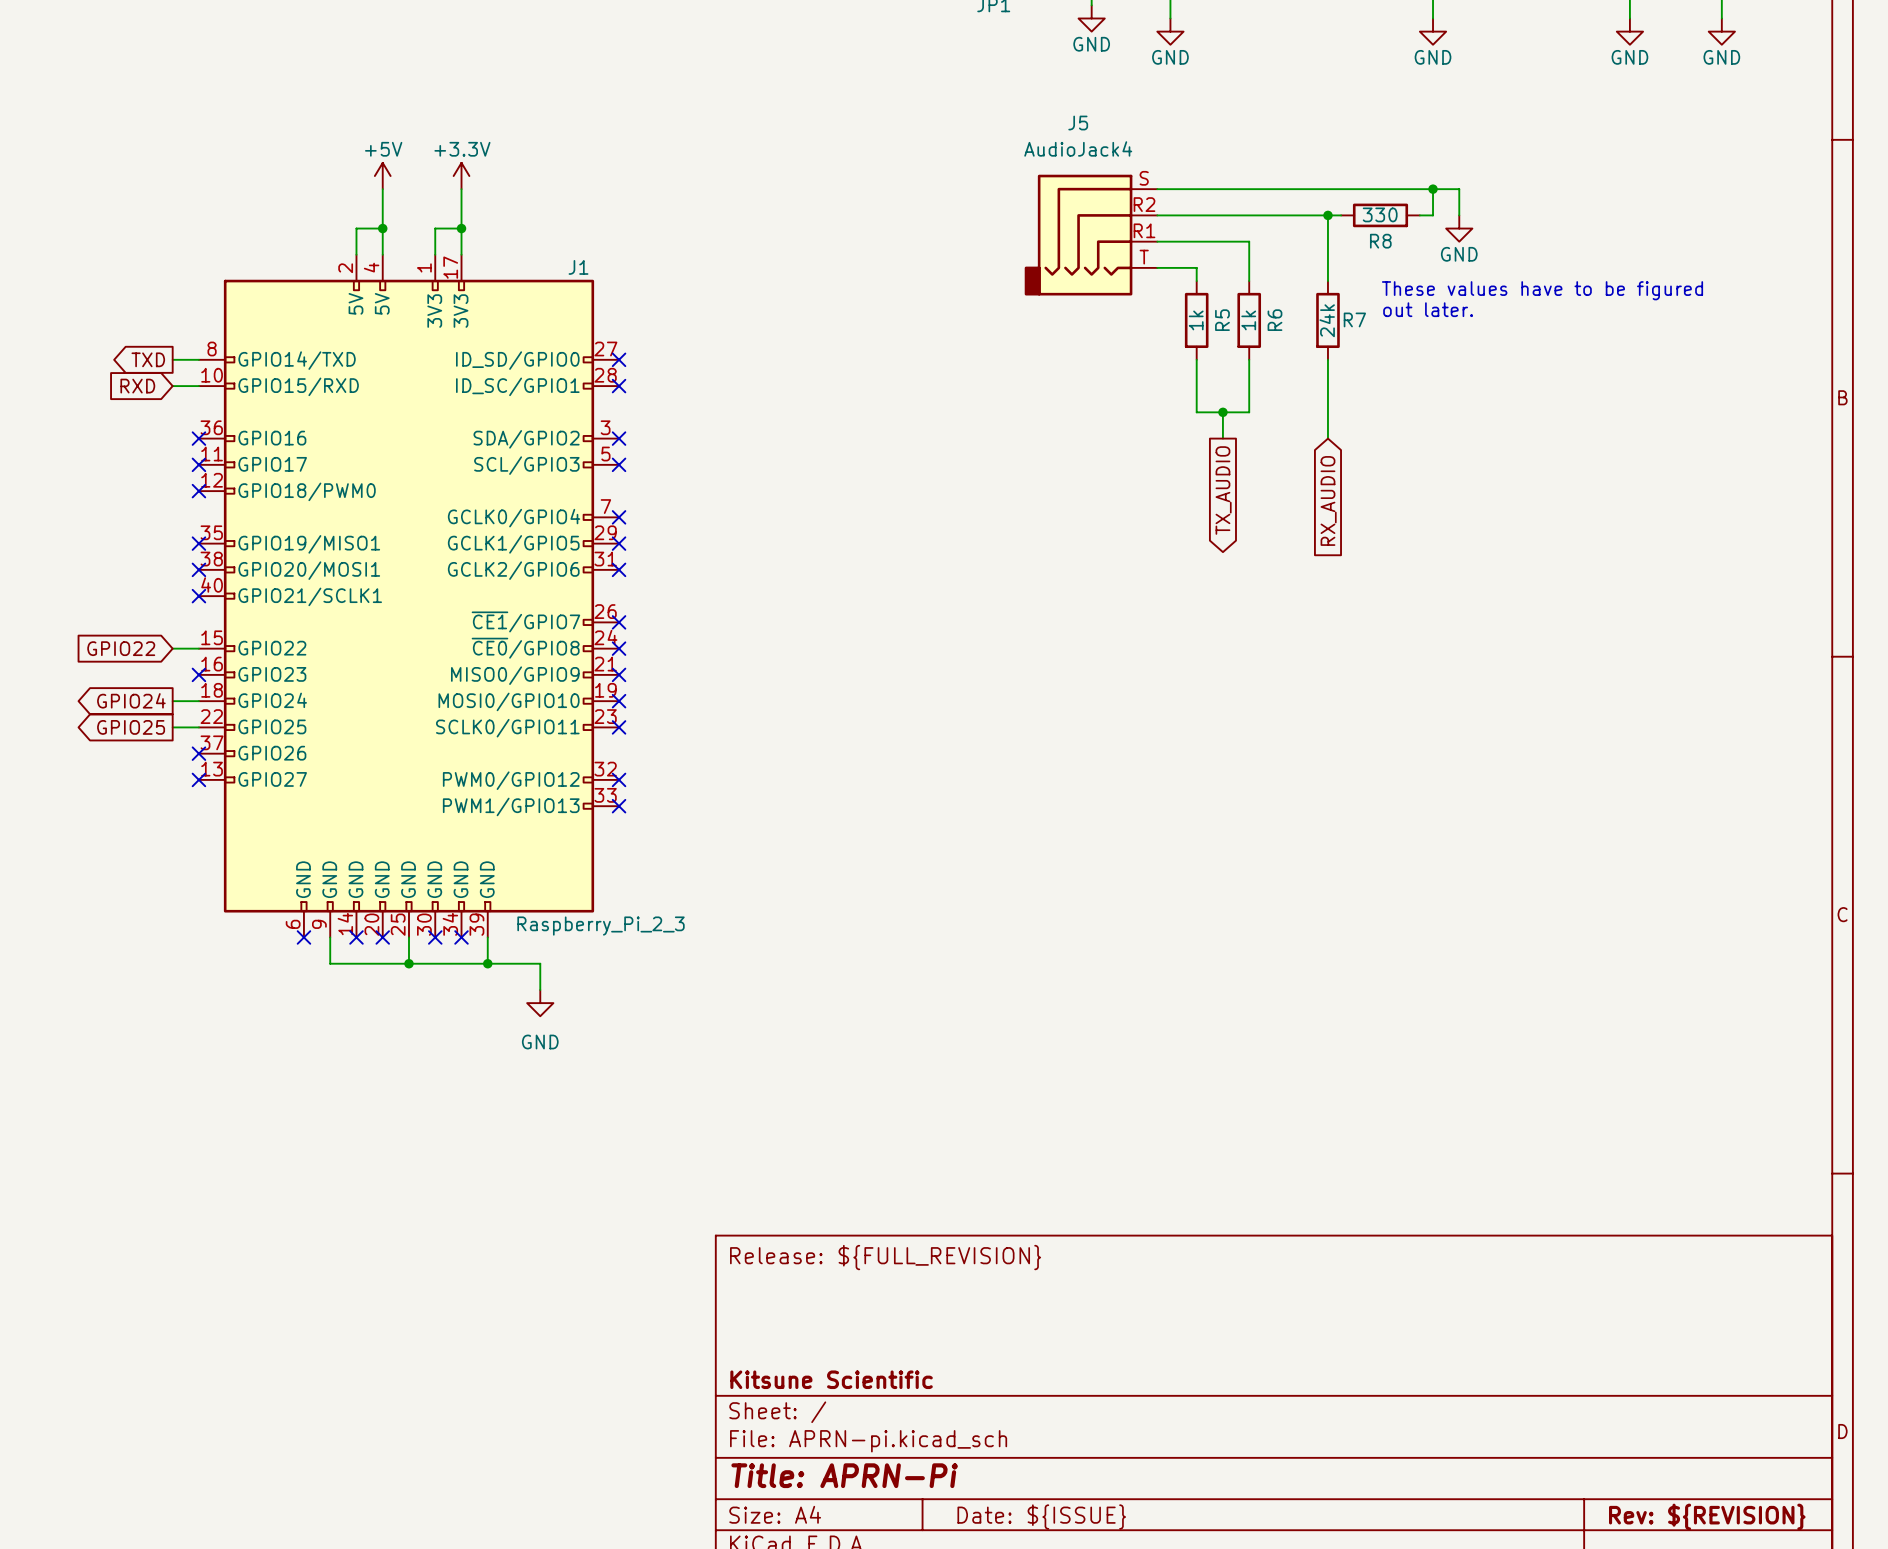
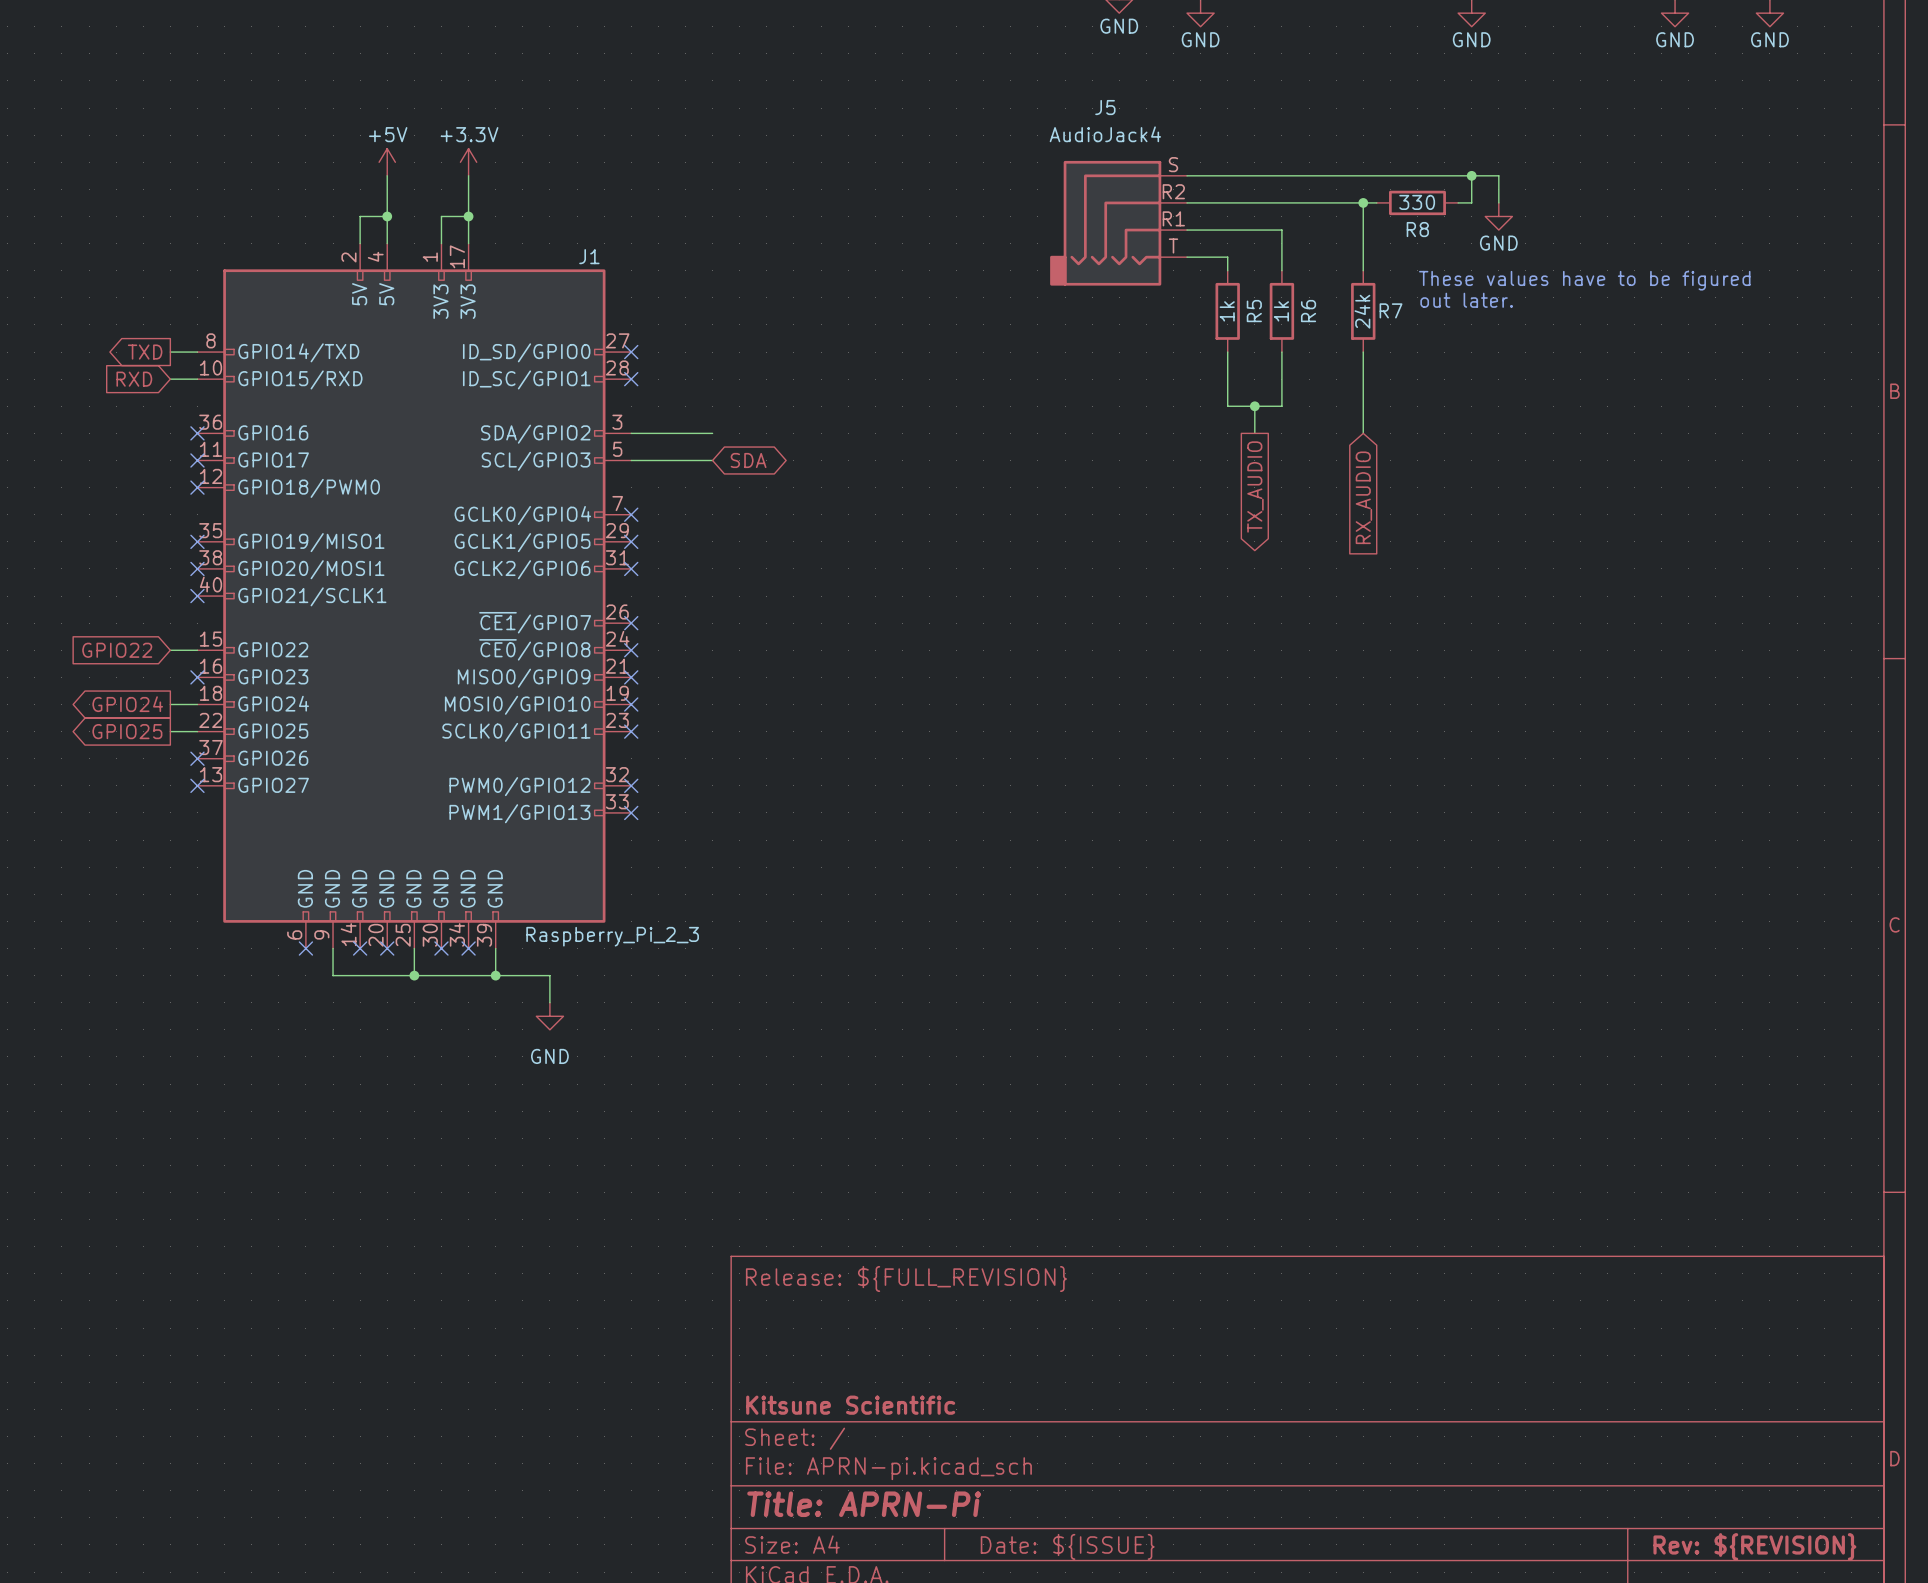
wire: none -> (631, 433) (712, 433)
no-connect mark: (619, 438) -> none
wire: none -> (631, 460) (712, 460)
no-connect mark: (619, 464) -> none
global label: none -> SDA (748, 460)

